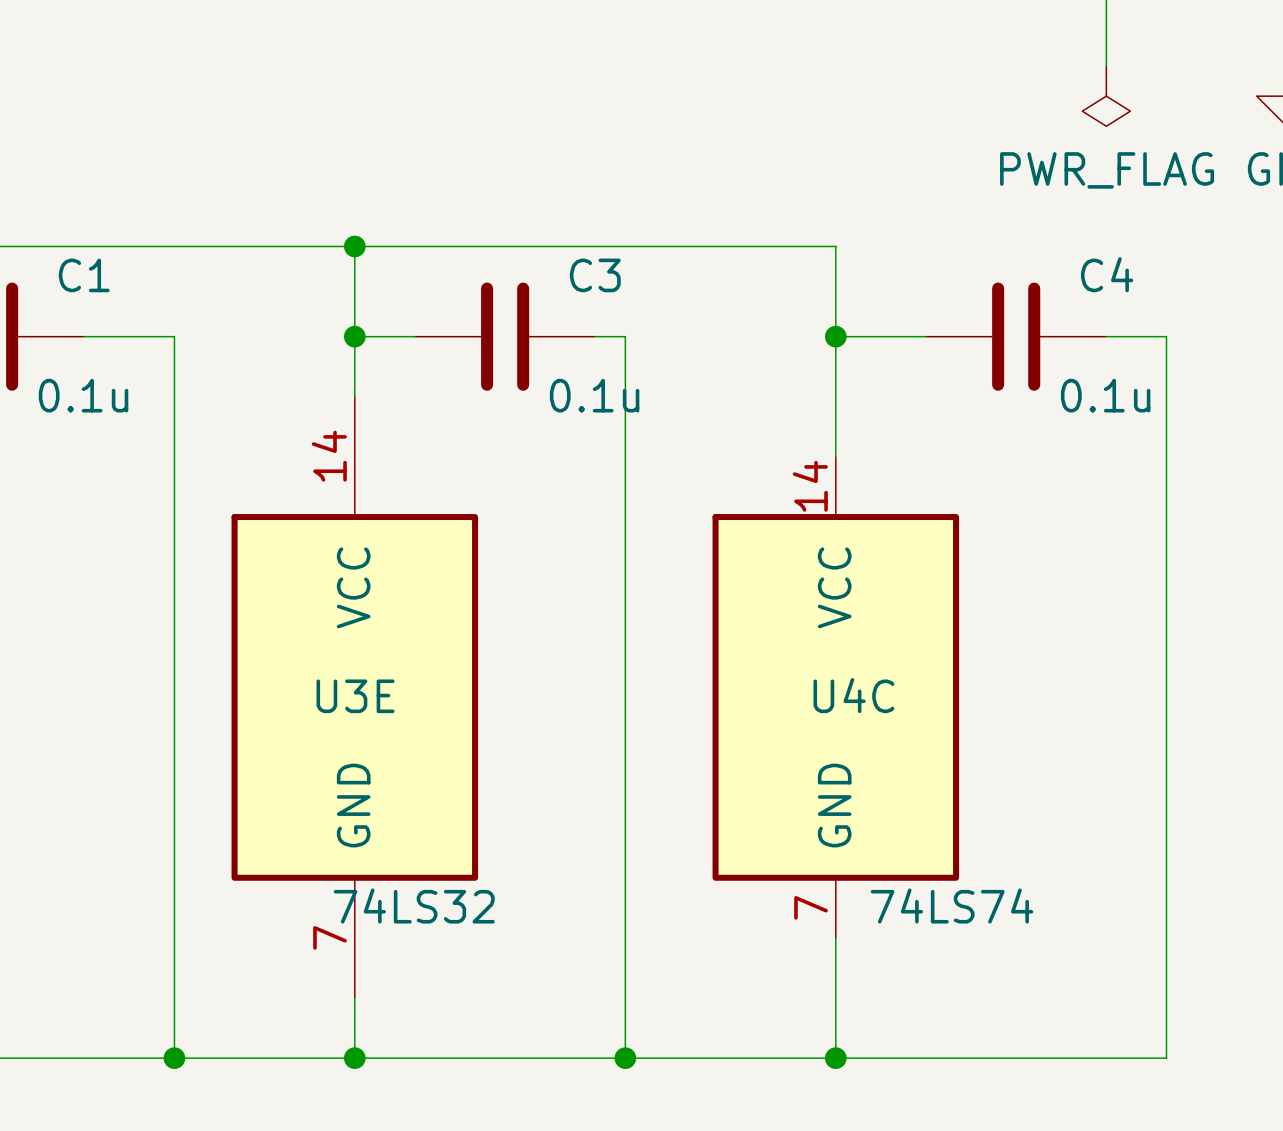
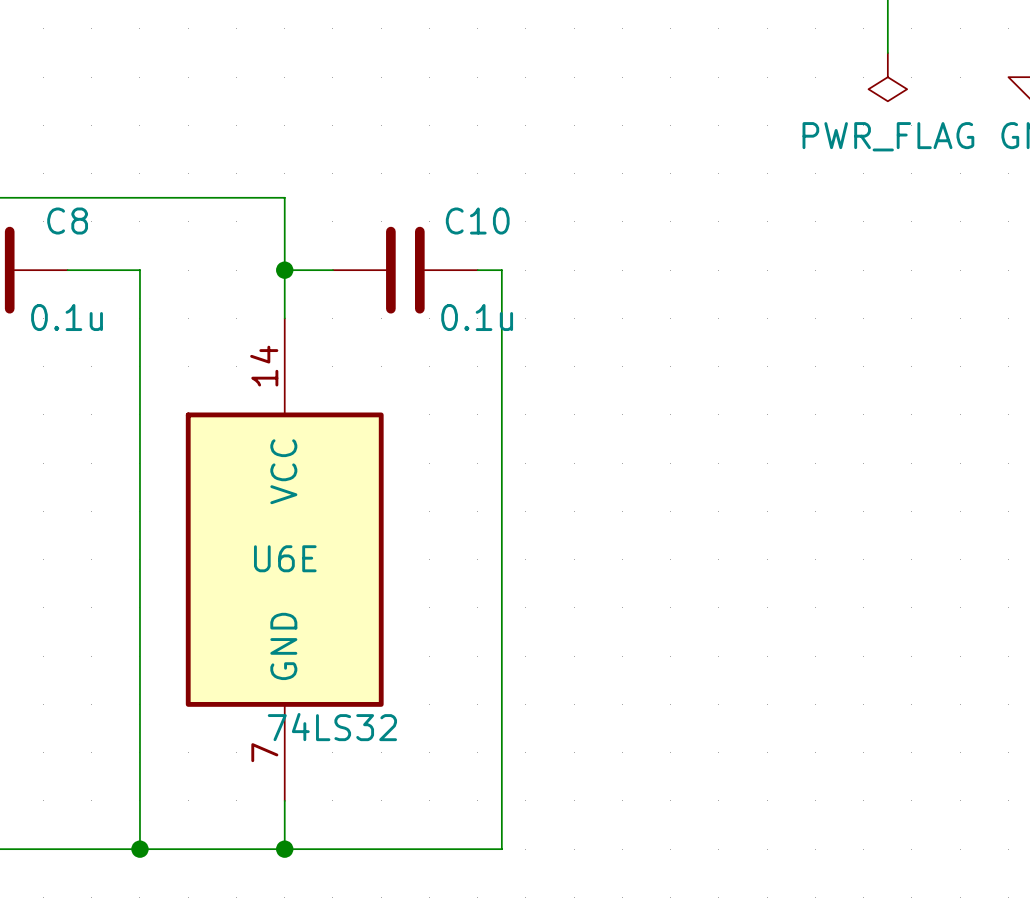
wire: (354, 246) (835, 246) (835, 456) -> none
junction: (354, 246) -> none
C1 name: C1 (84, 275) -> C8 (67, 221)
C3 name: C3 (595, 275) -> C10 (477, 221)
wire: (835, 336) (925, 336) -> none
junction: (835, 336) -> none
C4: 0.1u (1016, 336) -> none
wire: (1106, 336) (1166, 336) (1166, 1058) (625, 1058) -> none
U3E name: U3E (355, 696) -> U6E (285, 558)
U4C: 74LS74 (835, 697) -> none
wire: (835, 937) (835, 1058) -> none
junction: (625, 1058) -> none
junction: (835, 1058) -> none

